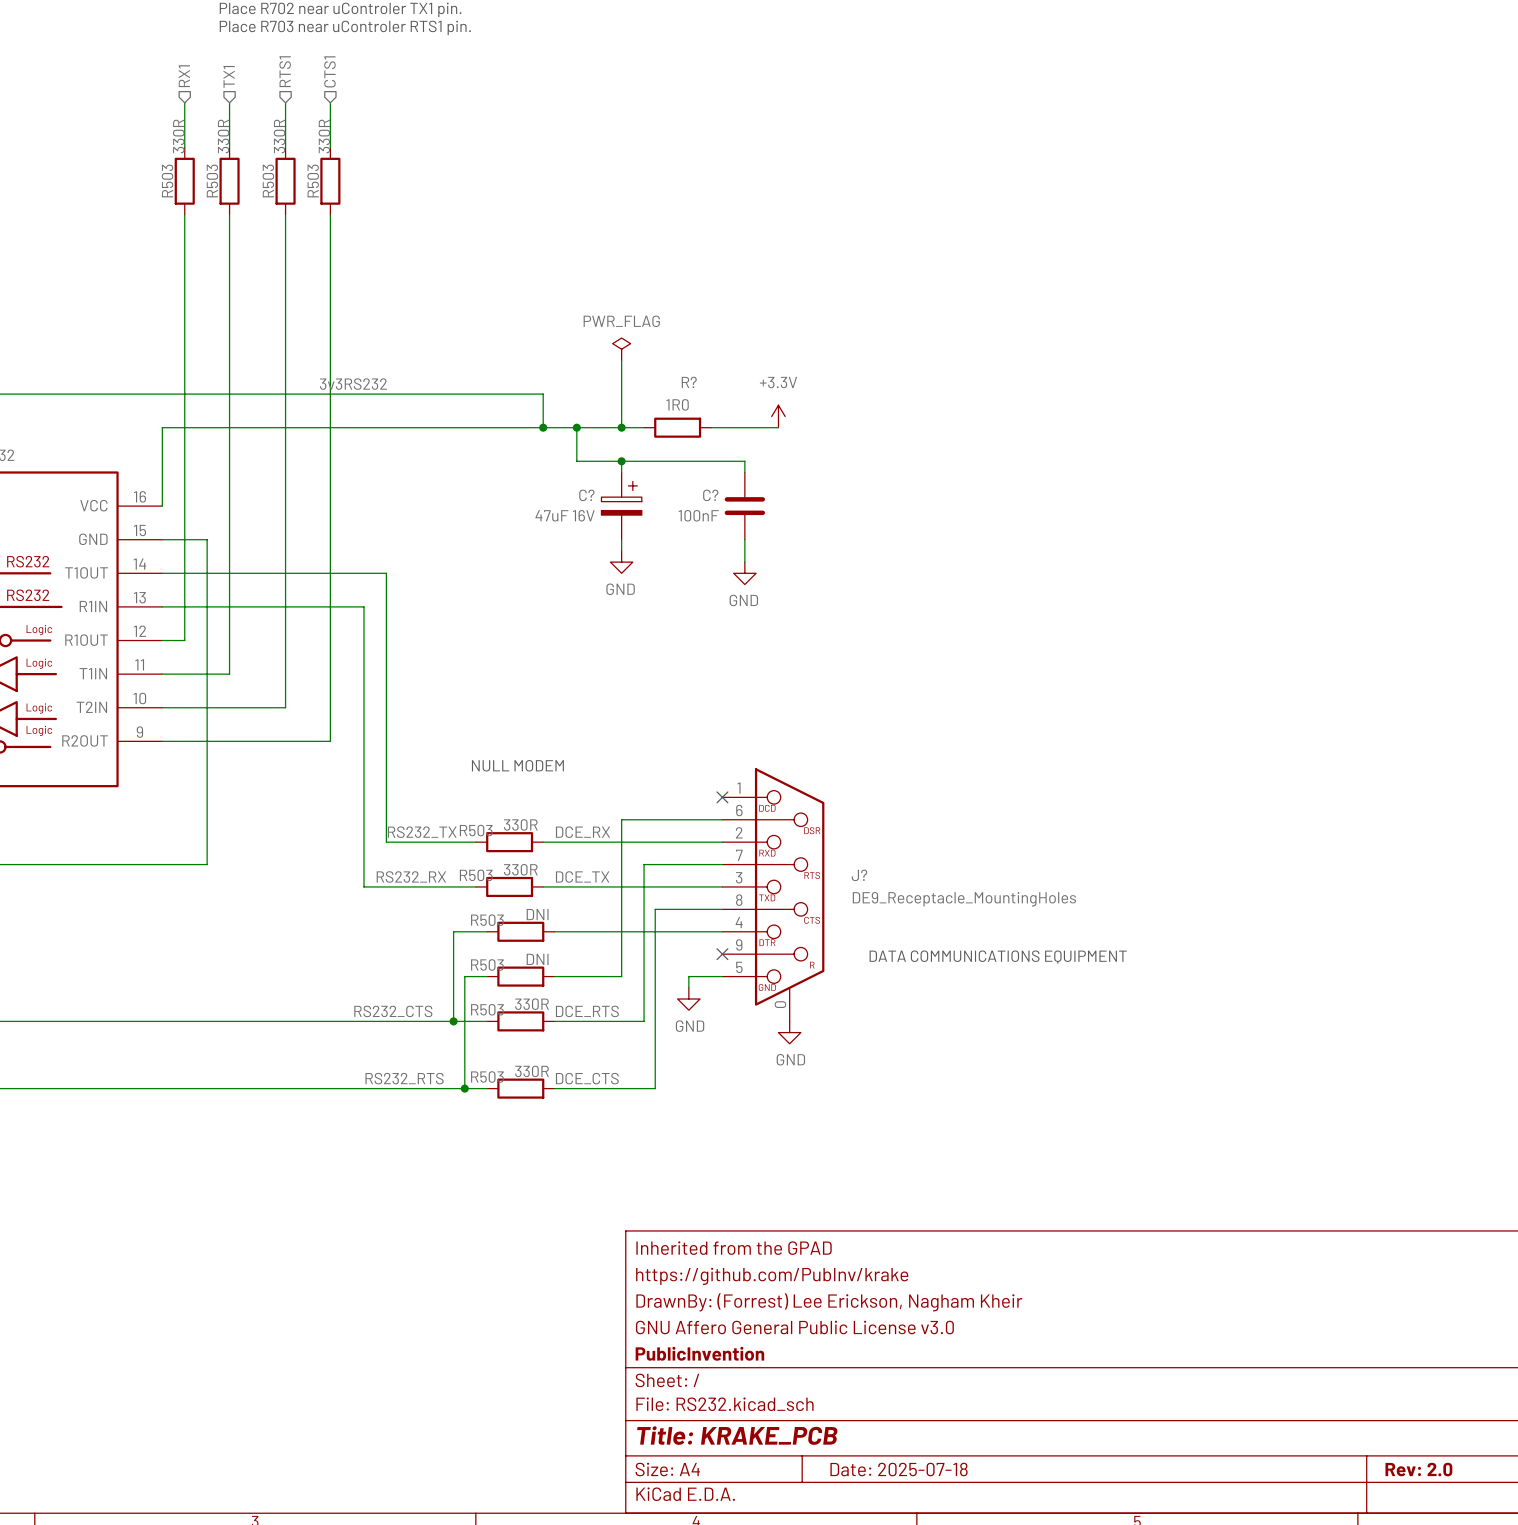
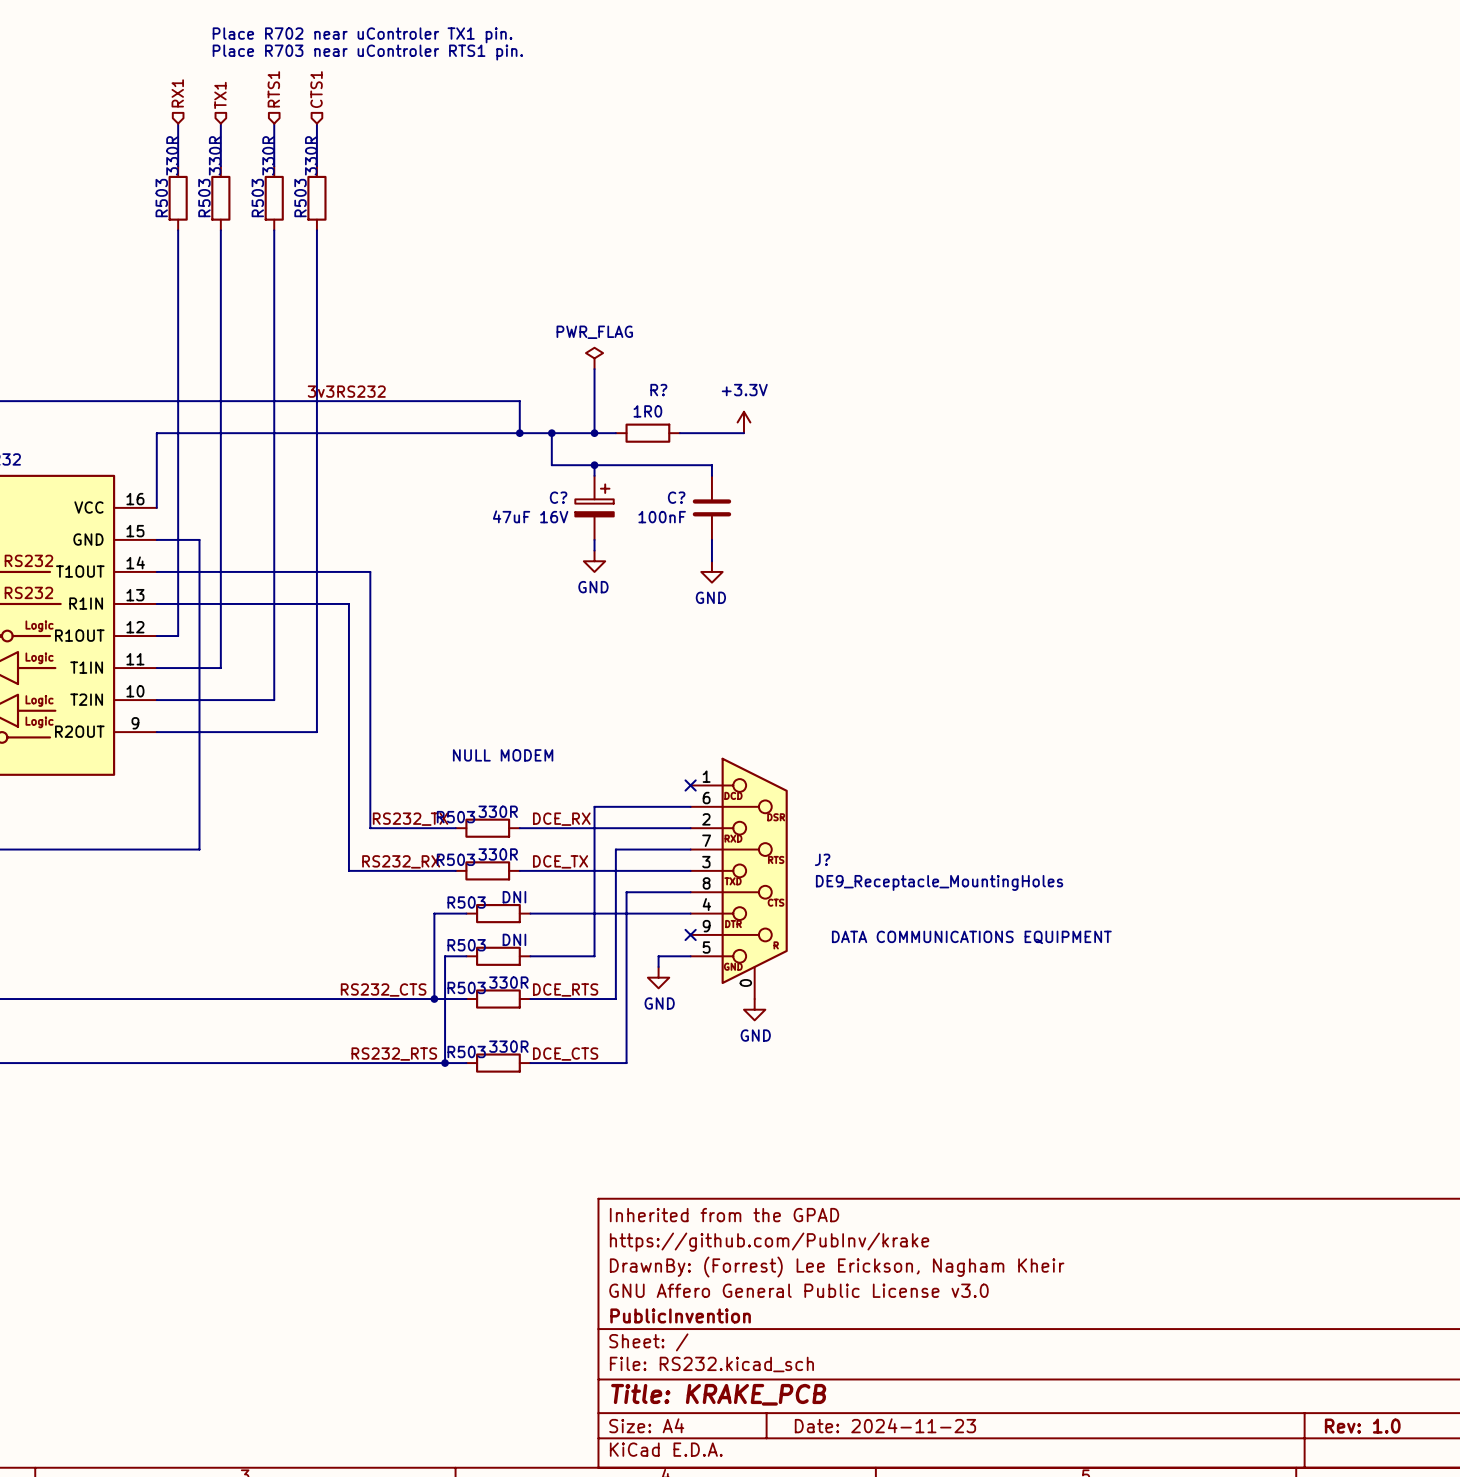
title block: Date: 2025-07-18 (899, 1469) -> Date: 2024-11-23 (885, 1425)
title block: Rev: 2.0 (1418, 1469) -> Rev: 1.0 (1362, 1426)

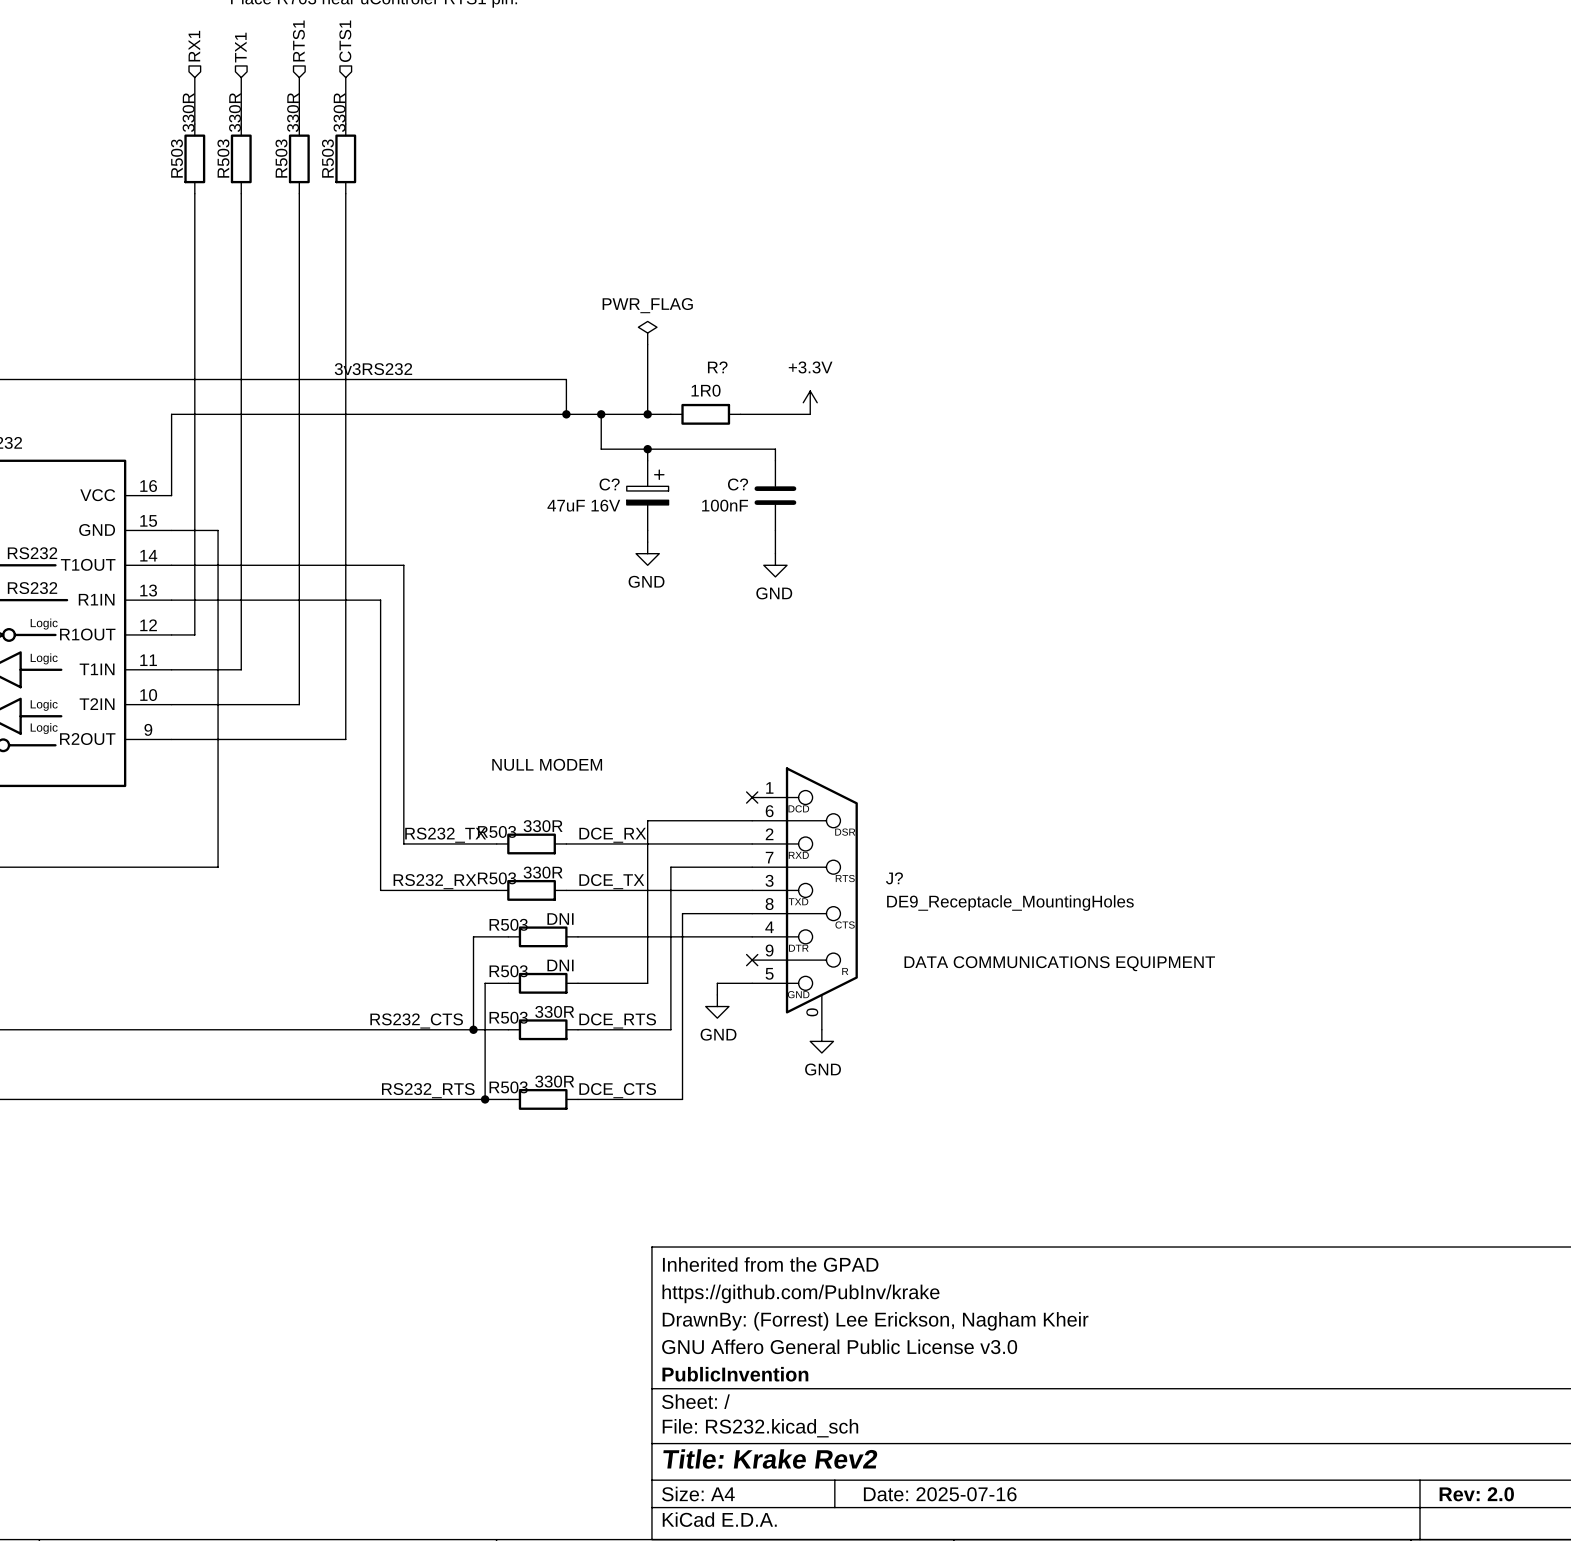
title block: Title: KRAKE_PCB (718, 1394) -> Title: Krake Rev2 (770, 1459)
title block: Date: 2024-11-23 (885, 1425) -> Date: 2025-07-16 (940, 1494)
title block: Rev: 1.0 (1362, 1426) -> Rev: 2.0 (1476, 1494)

